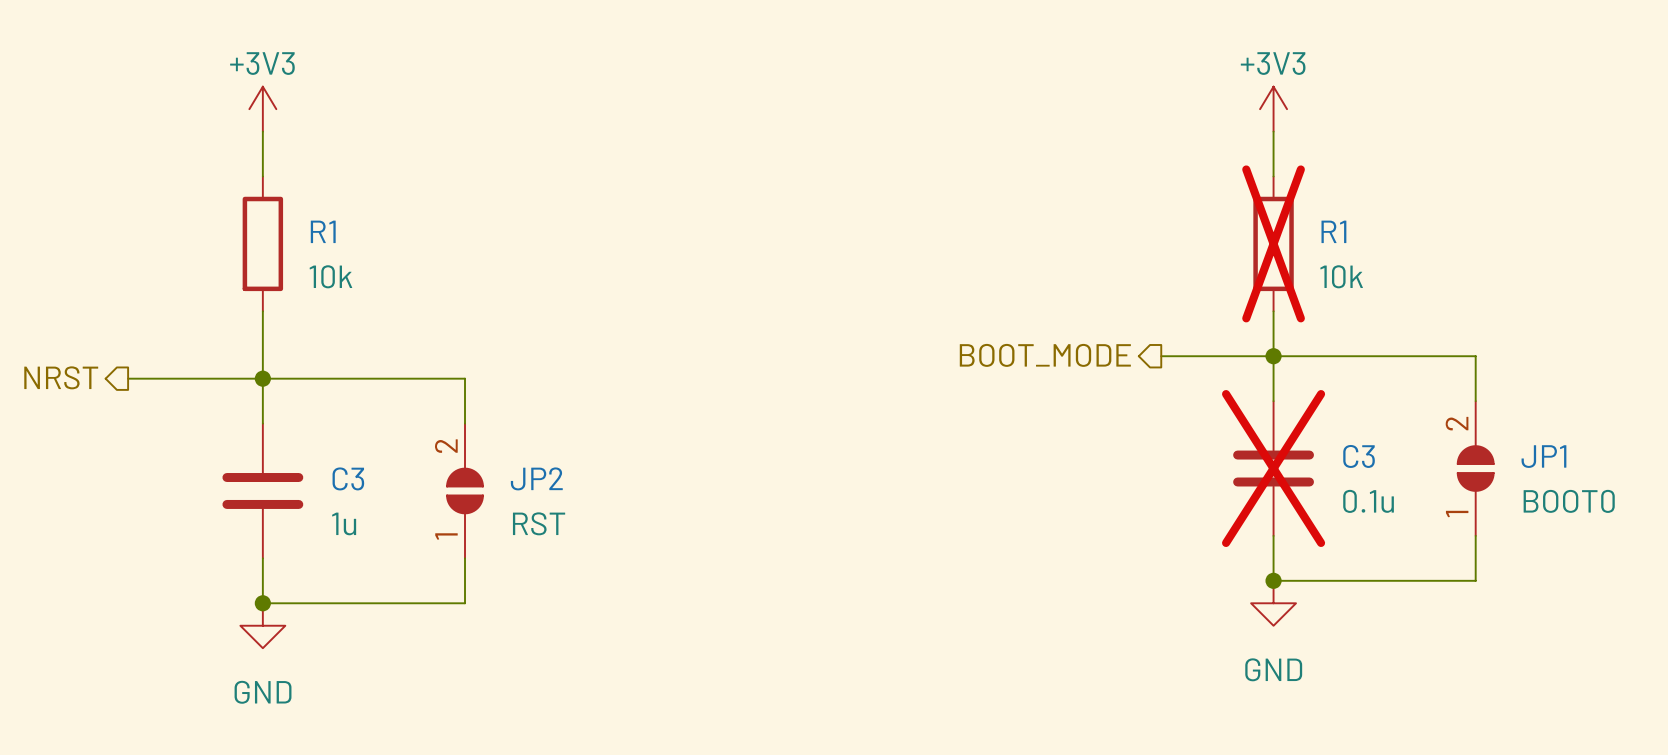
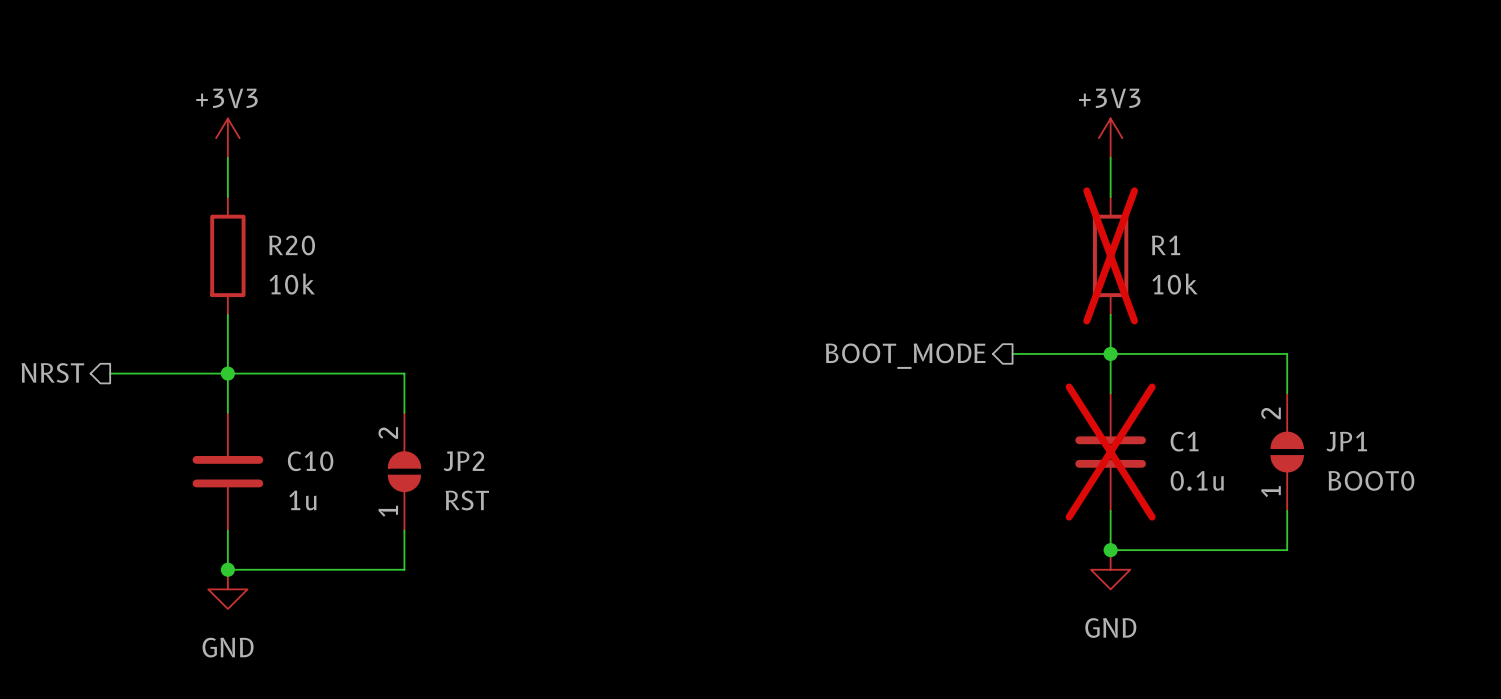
R1 name: R1 (323, 231) -> R20 (292, 245)
C3 name: C3 (1359, 456) -> C1 (1184, 441)
C3 name: C3 (348, 478) -> C10 (310, 461)

